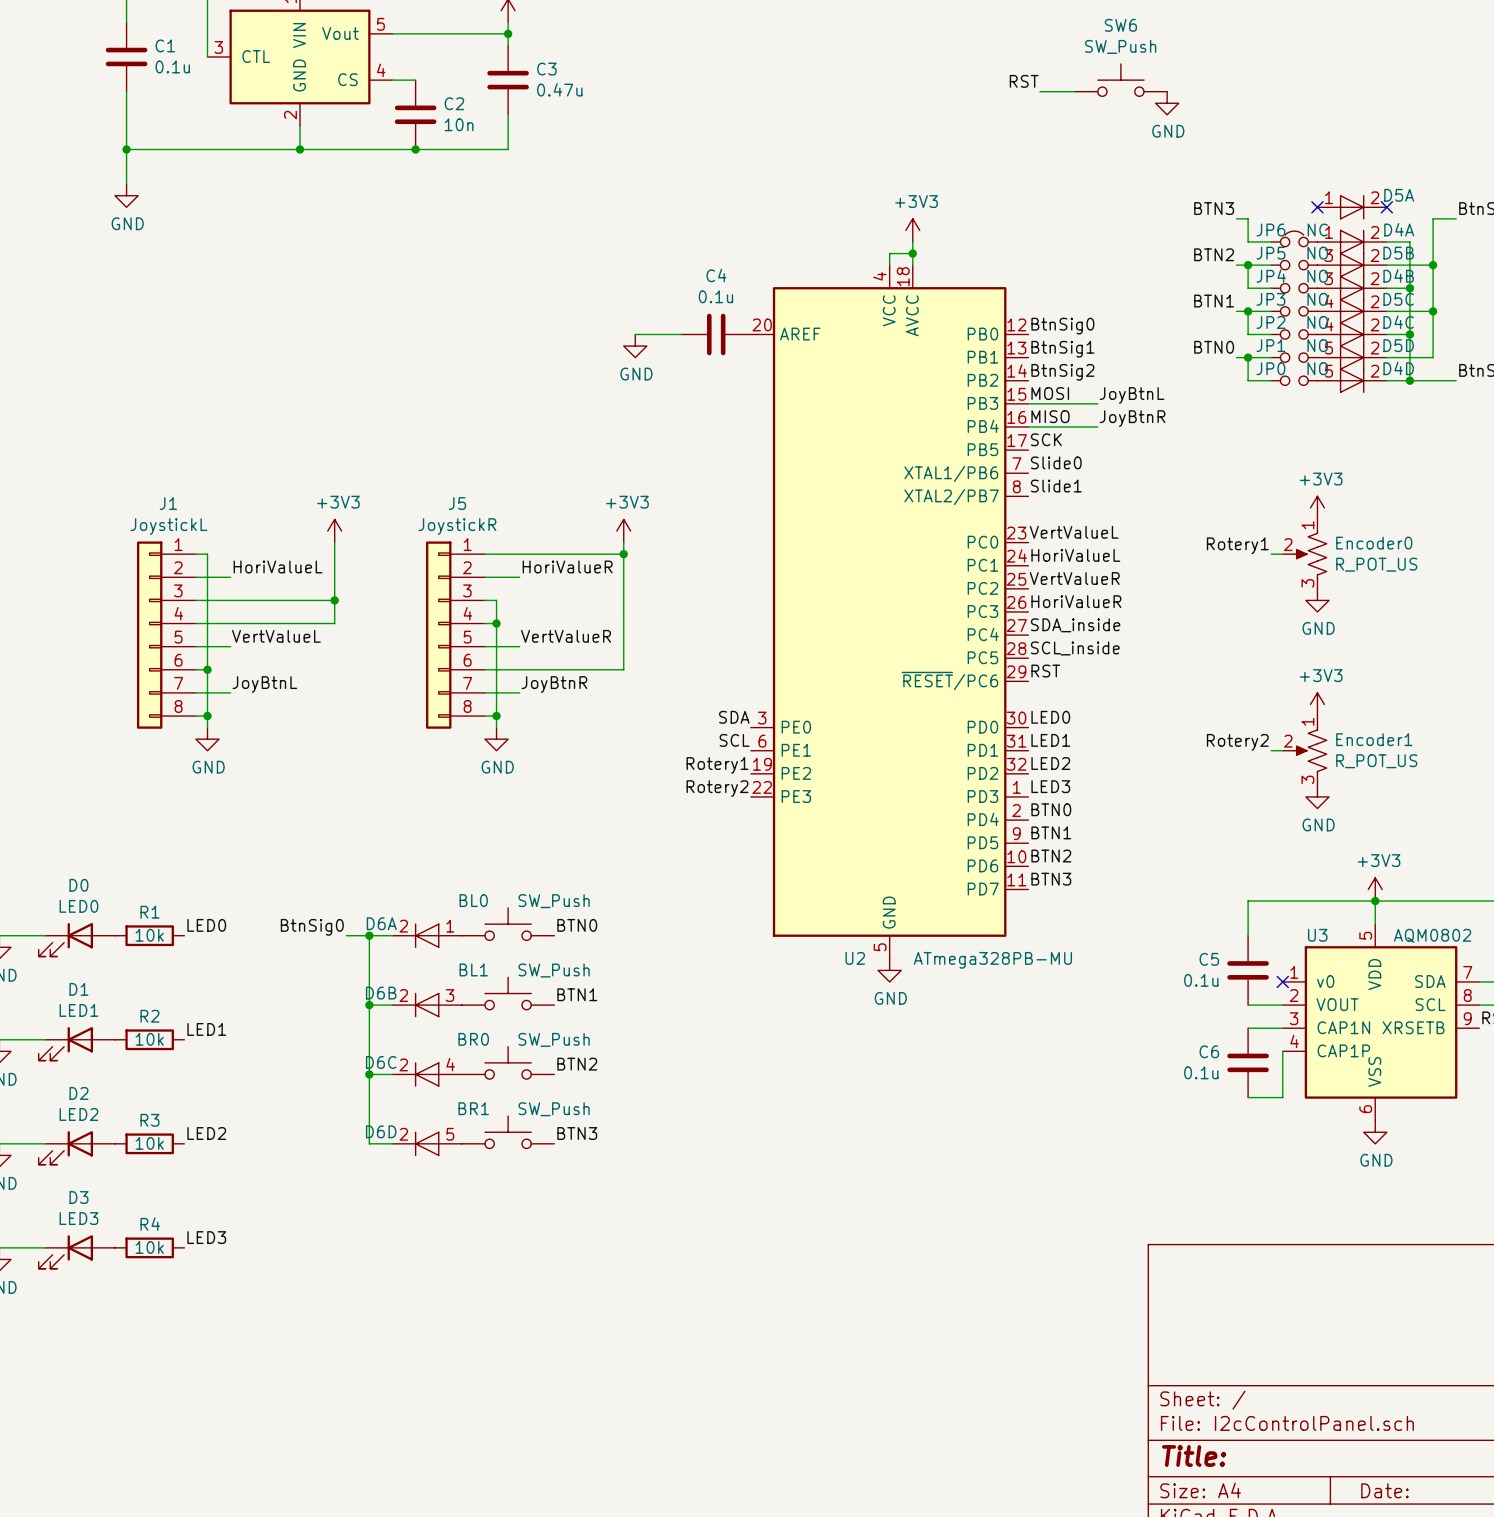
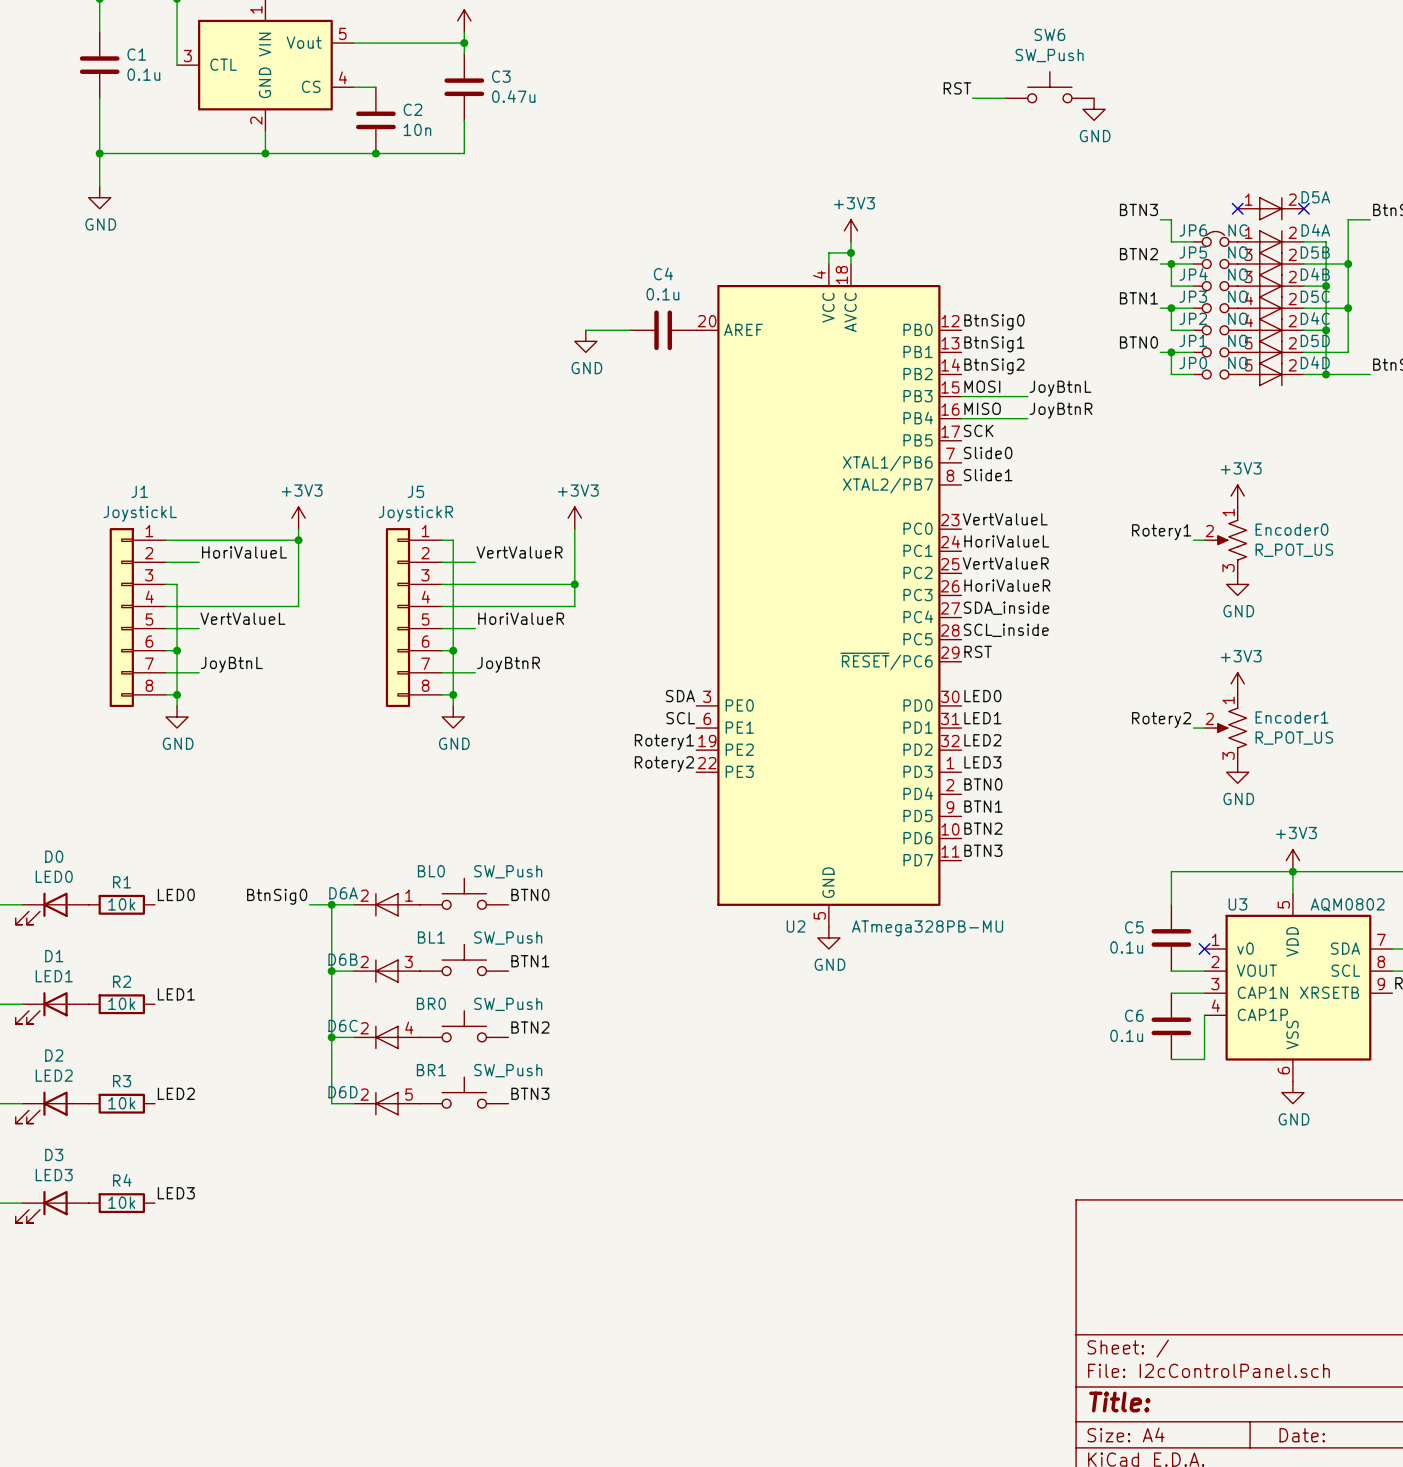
wire: (207, 554) (207, 600) (334, 600) -> (177, 540) (298, 540)
wire: (496, 554) (623, 554) -> (453, 540) (453, 584) (574, 584)
junction position: (623, 554) -> (574, 584)
label: HoriValueR (567, 566) -> VertValueR (519, 552)
junction position: (334, 600) -> (298, 540)
junction position: (496, 623) -> (453, 650)
wire: (623, 623) (623, 669) (496, 669) -> (574, 606) (453, 606)
label: VertValueR (566, 636) -> HoriValueR (521, 618)

